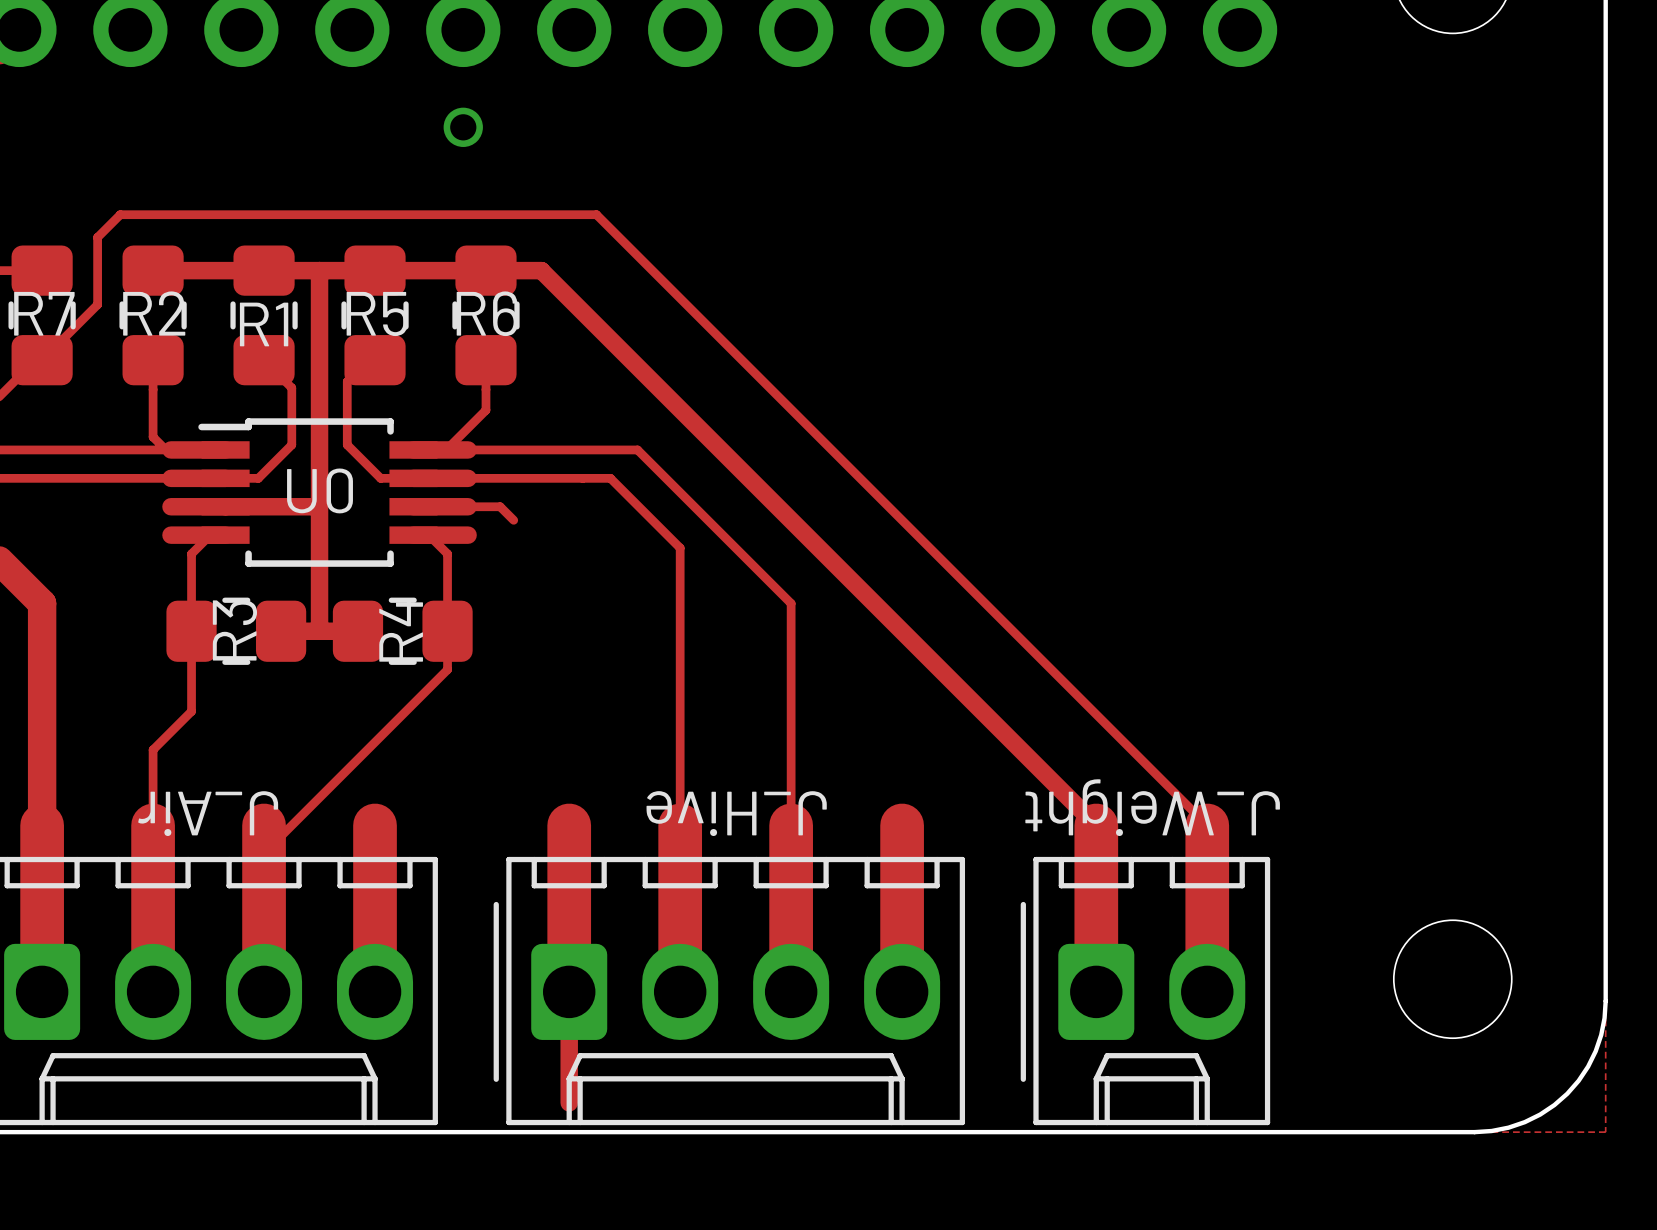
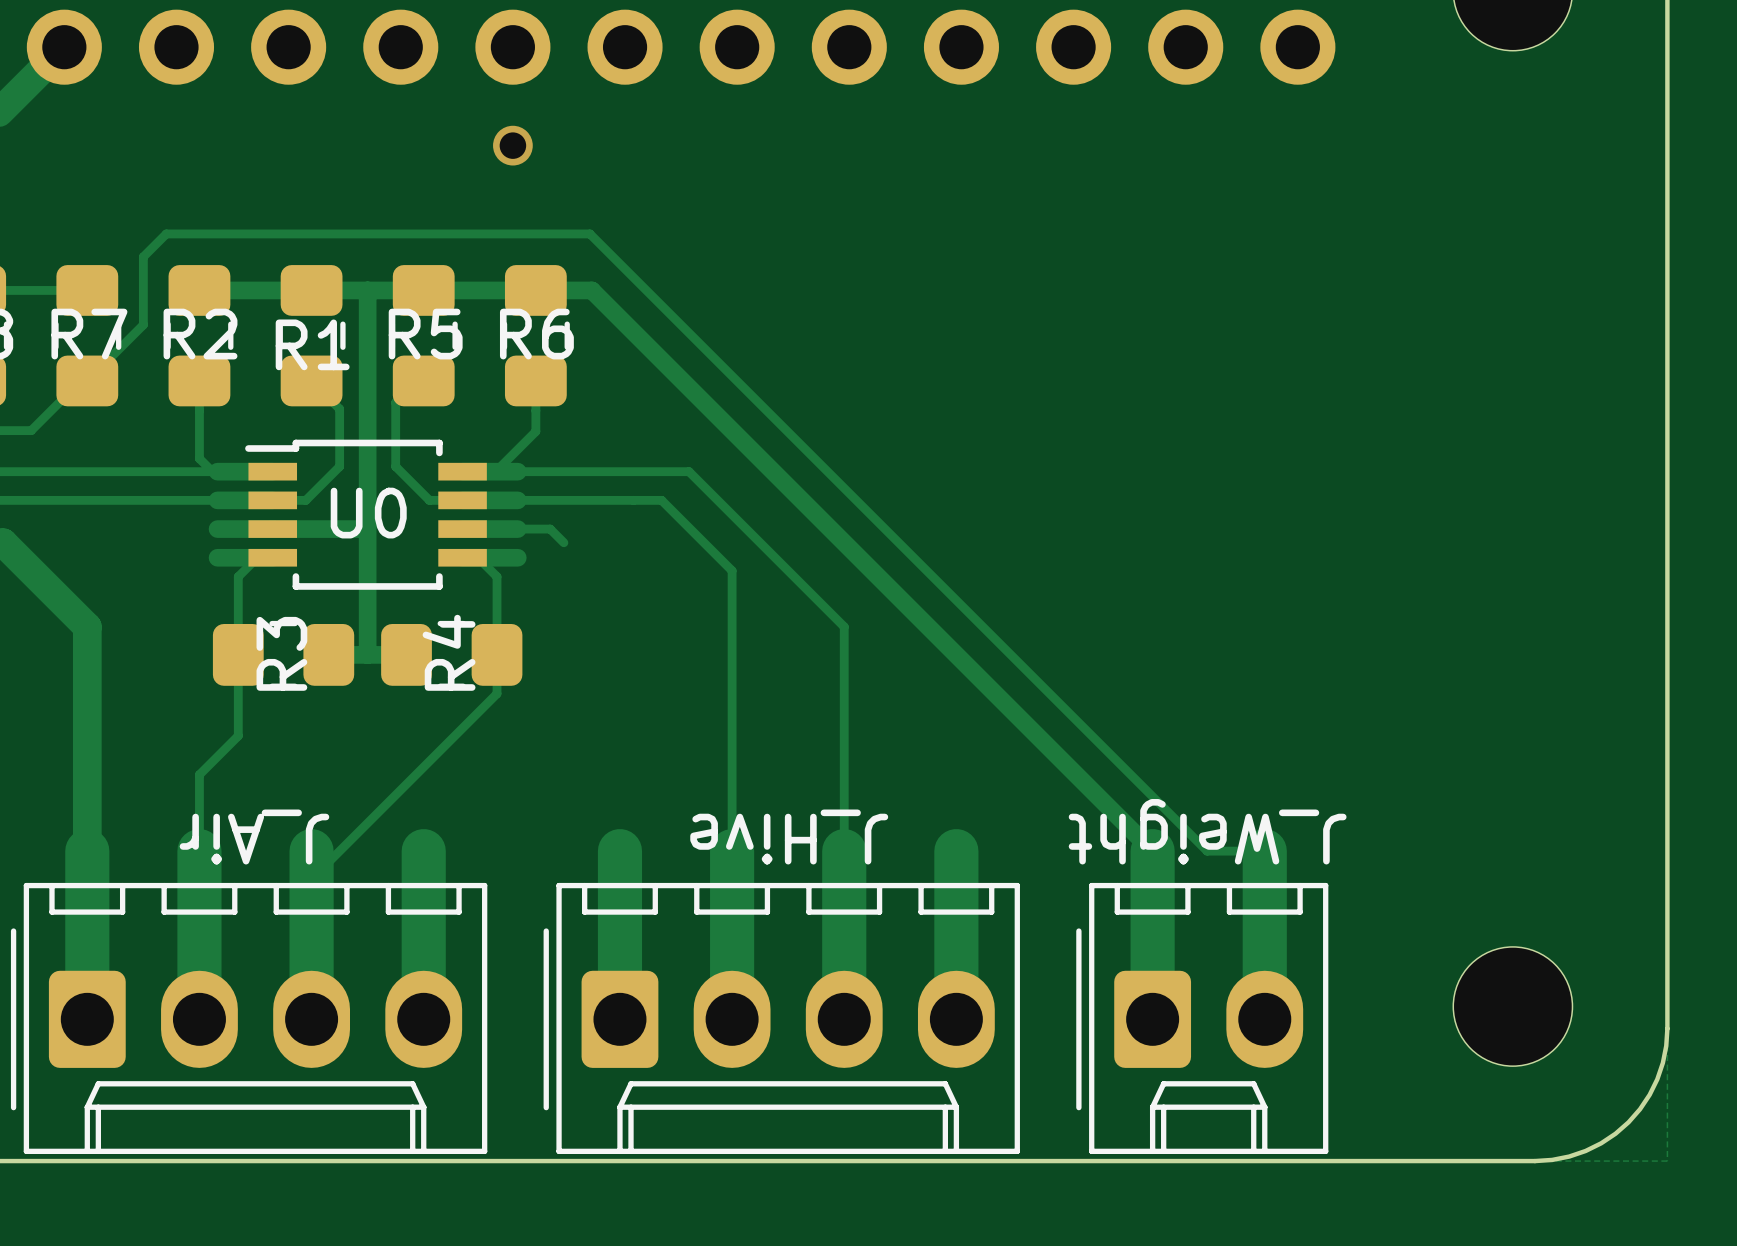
track: (539, 214) (596, 214) (1207, 825) -> (589, 233) (1207, 851) (1264, 851)
track: (569, 991) (569, 1102) -> none

